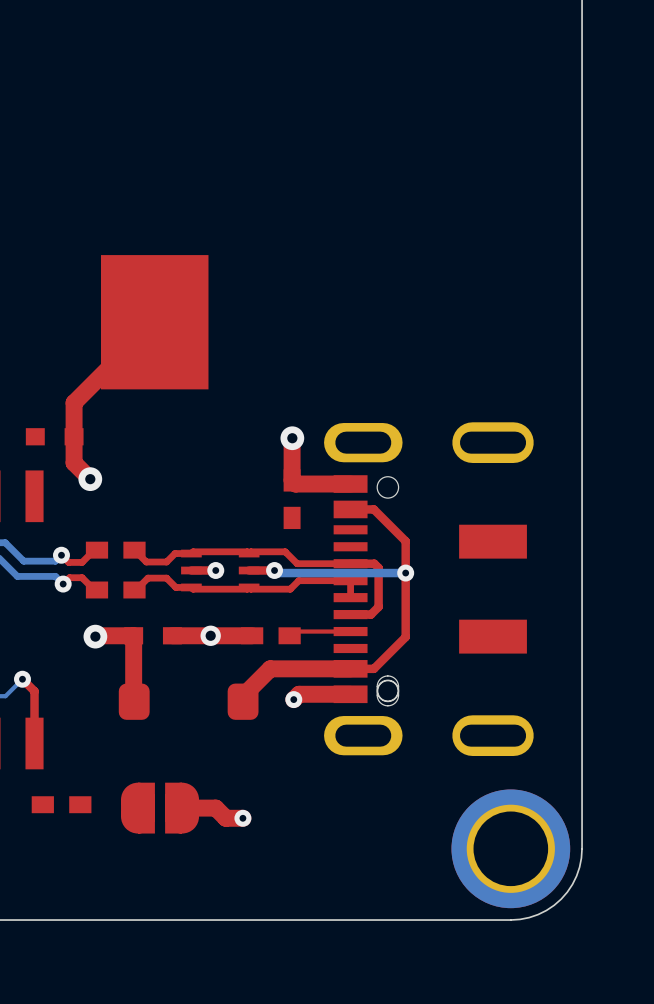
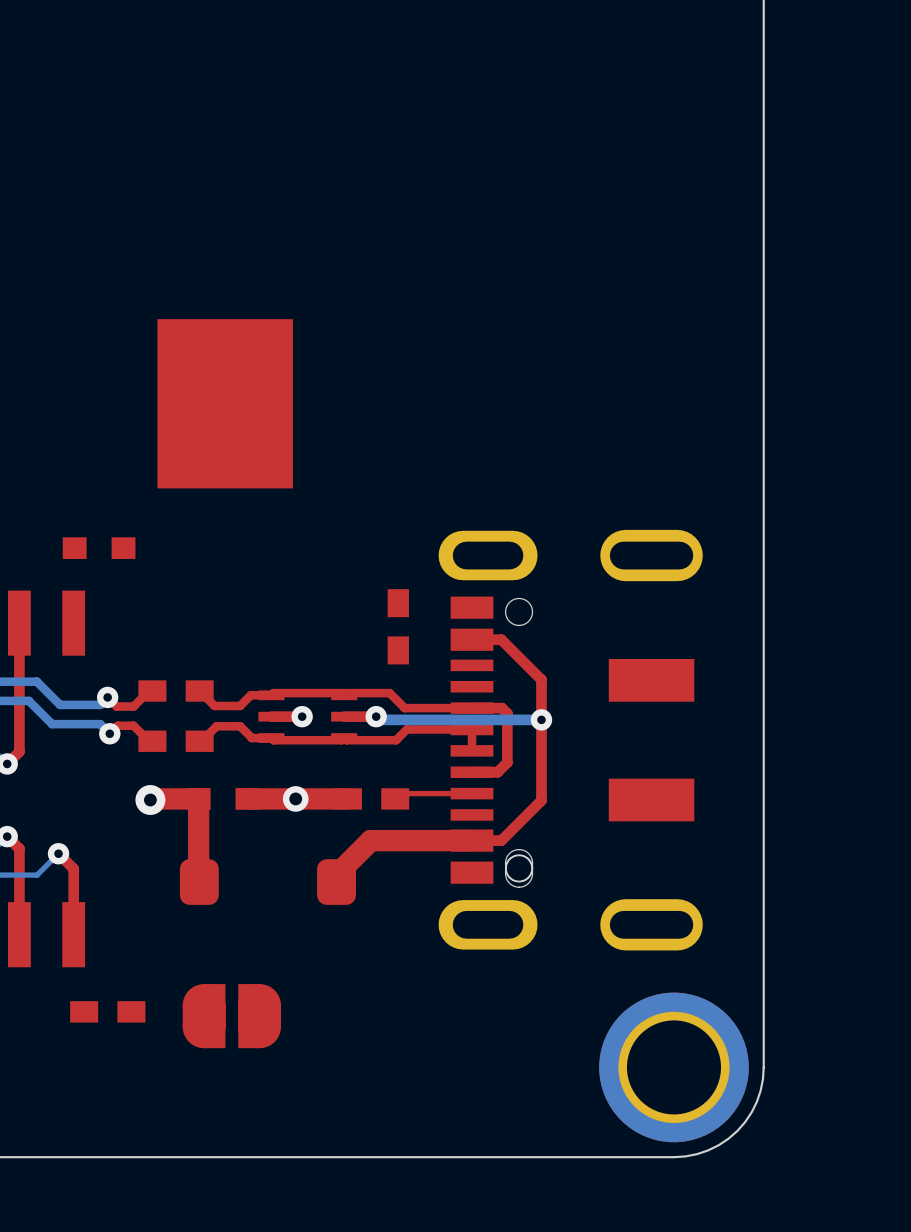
top track: (154, 322) (74, 402) (74, 462) (90, 479) -> none
top track: (292, 438) (292, 480) (295, 484) (350, 484) -> none
via: (292, 438) -> none
via: (90, 479) -> none
top track: (350, 694) (299, 694) (293, 699) -> none
via: (293, 699) -> none
top track: (182, 808) (215, 808) (225, 818) (242, 818) -> none
via: (242, 818) -> none

